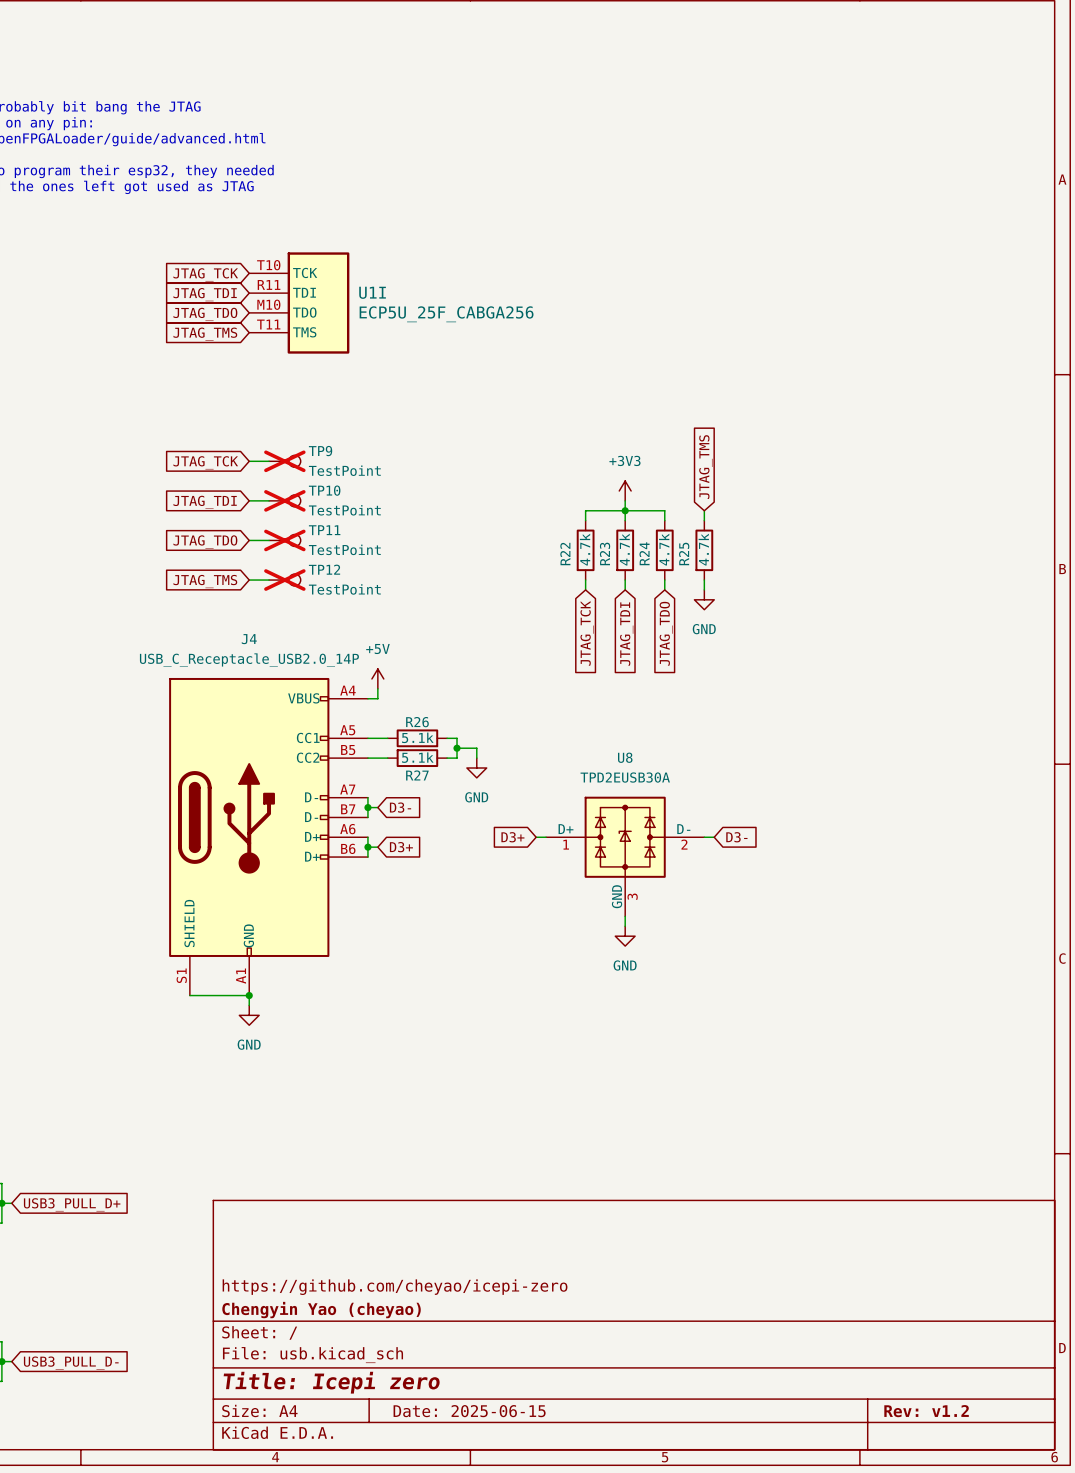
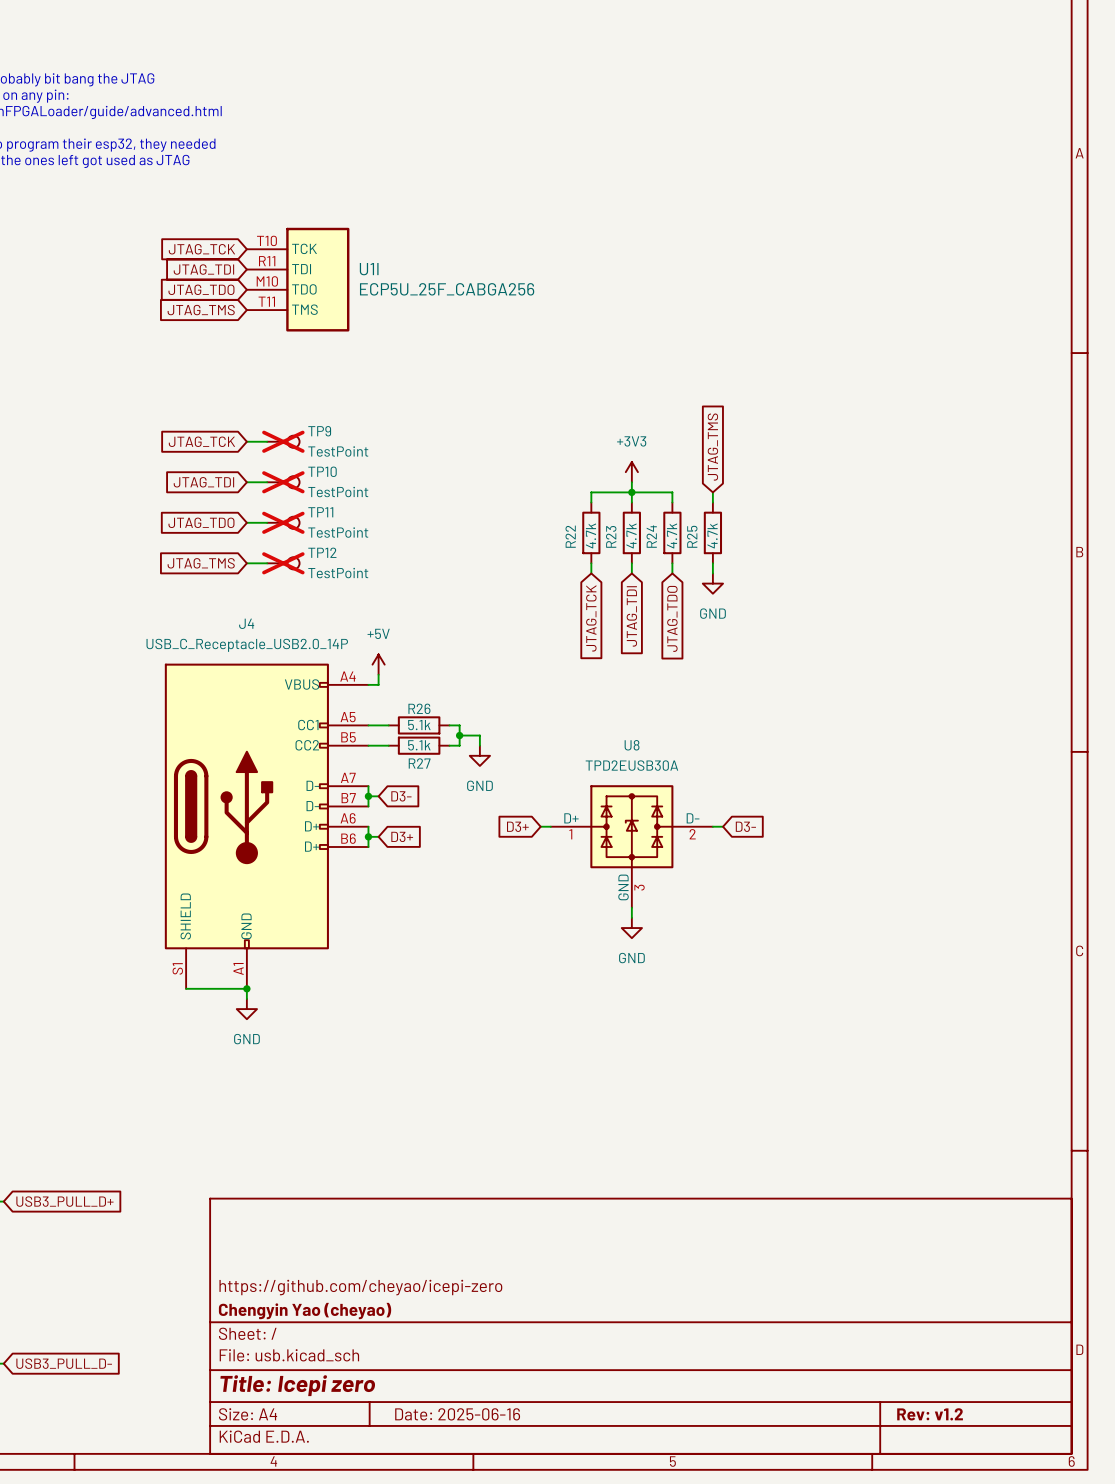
title block: Date: 2025-06-15 (469, 1411) -> Date: 2025-06-16 (457, 1414)

